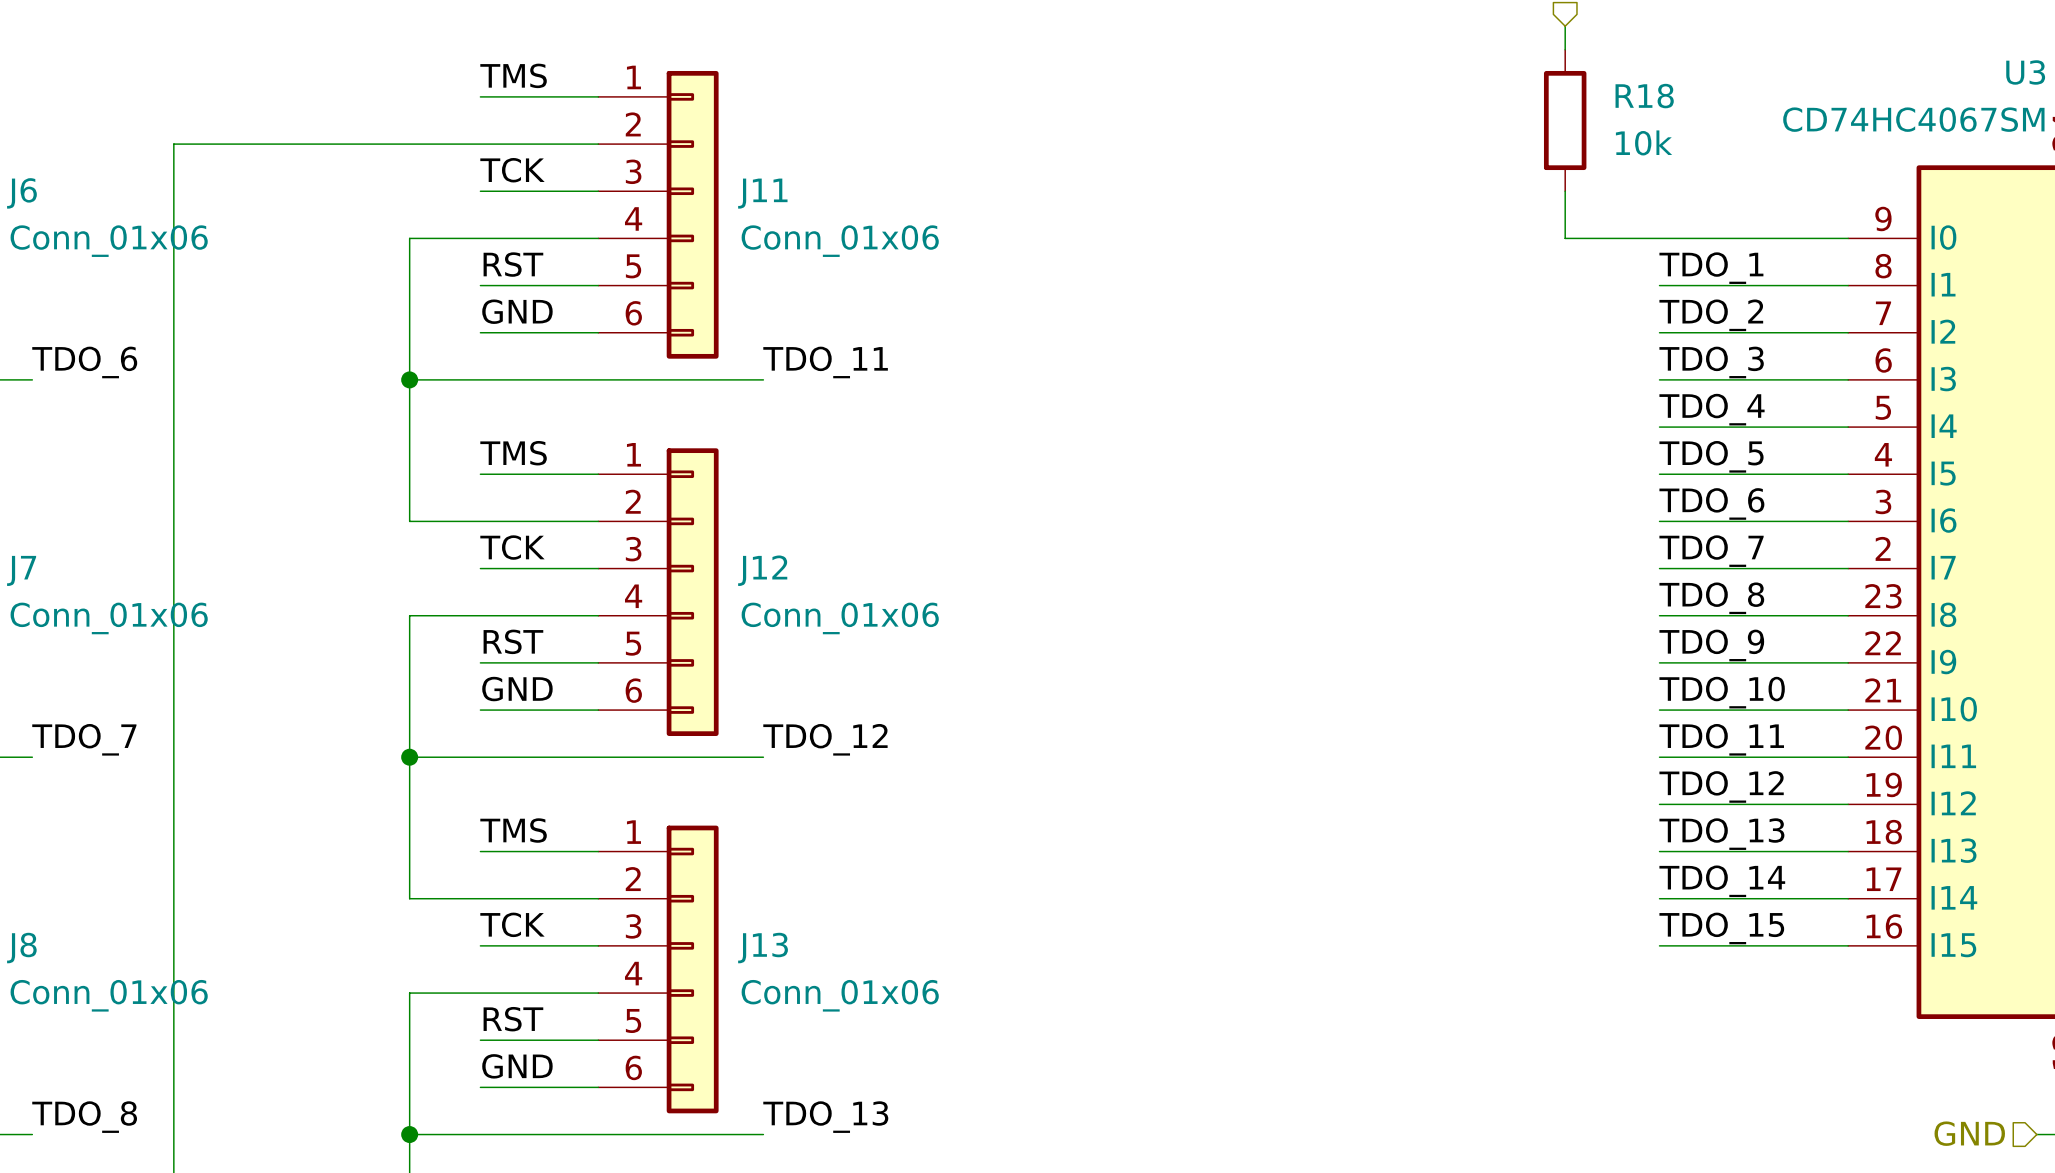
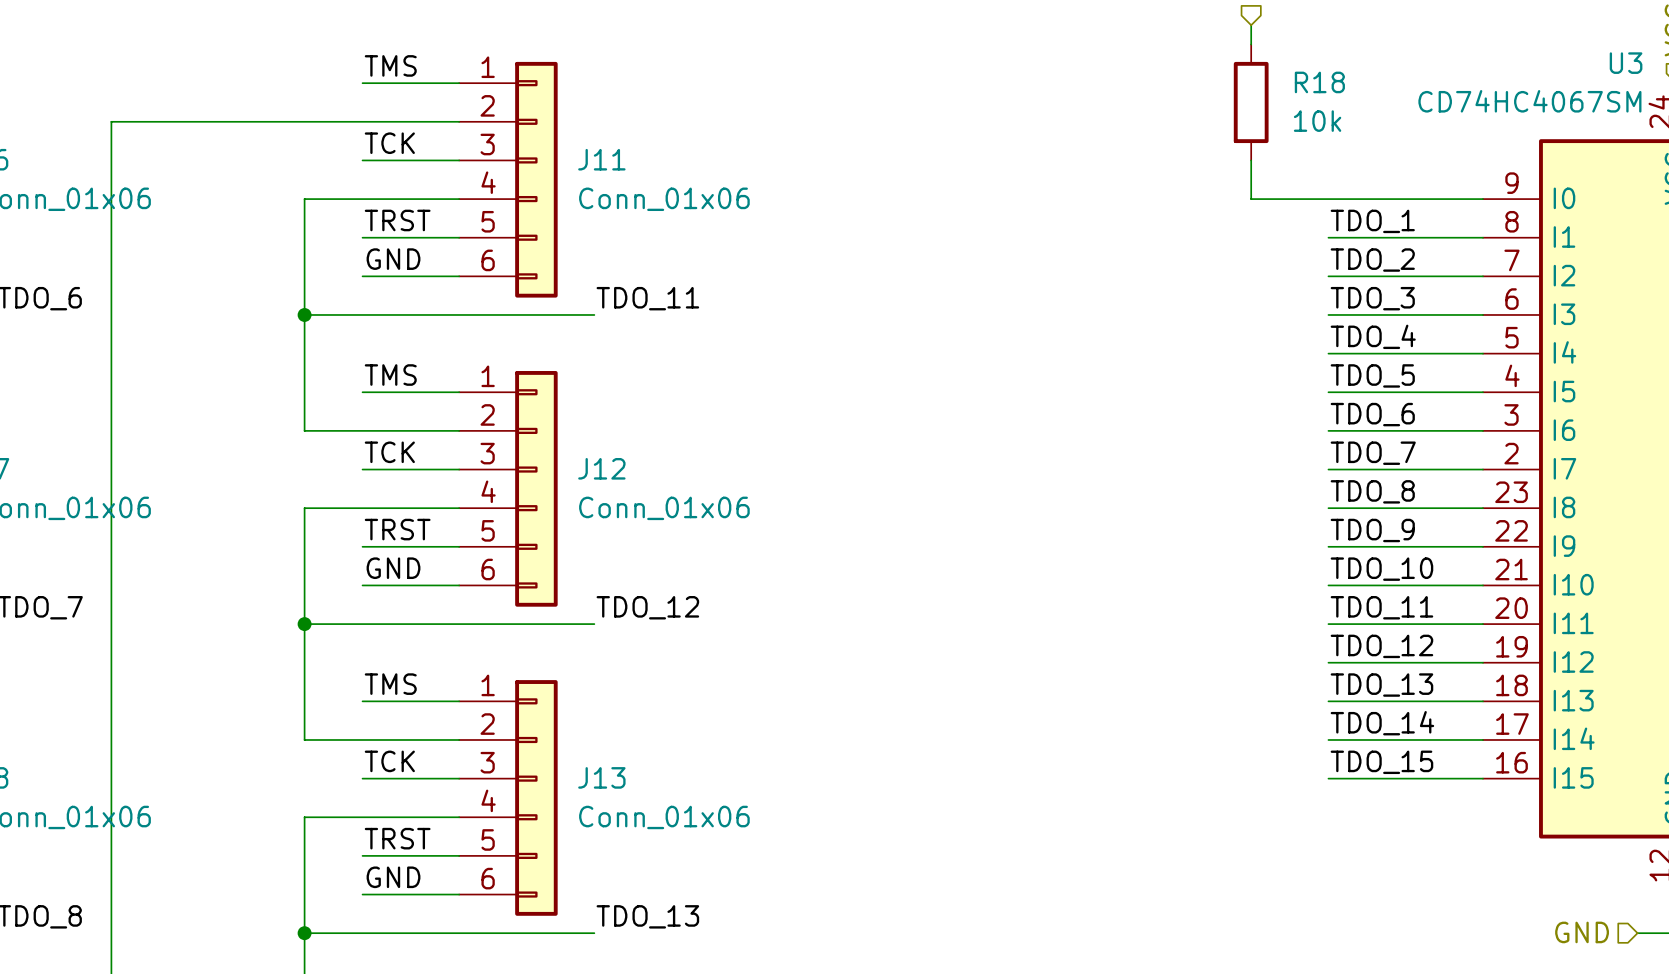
label: RST (513, 264) -> TRST (397, 220)
label: RST (513, 641) -> TRST (397, 529)
label: RST (513, 1019) -> TRST (397, 838)

